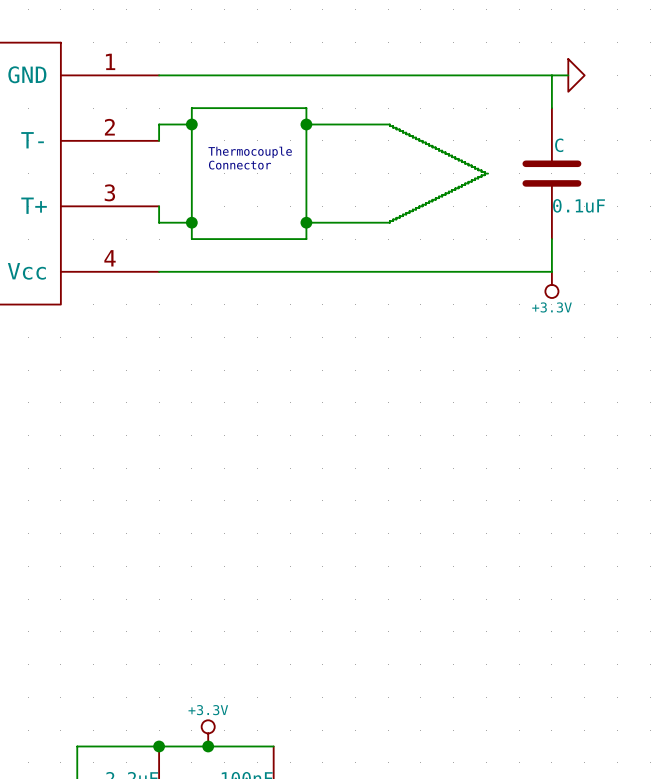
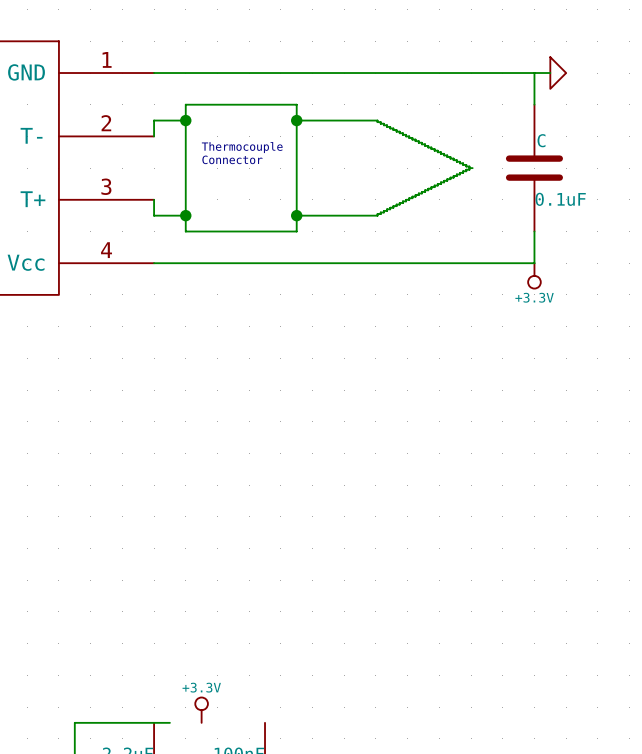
junction: (159, 746) -> none
wire: (175, 746) (273, 746) -> none
junction: (208, 746) -> none

